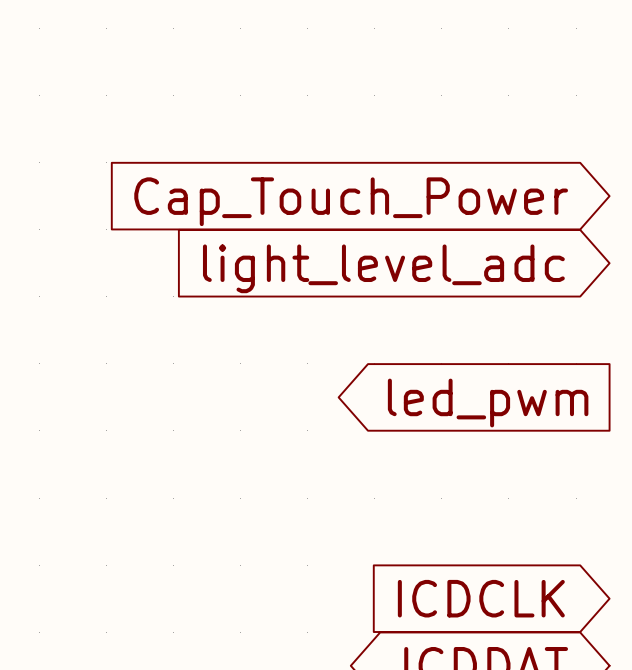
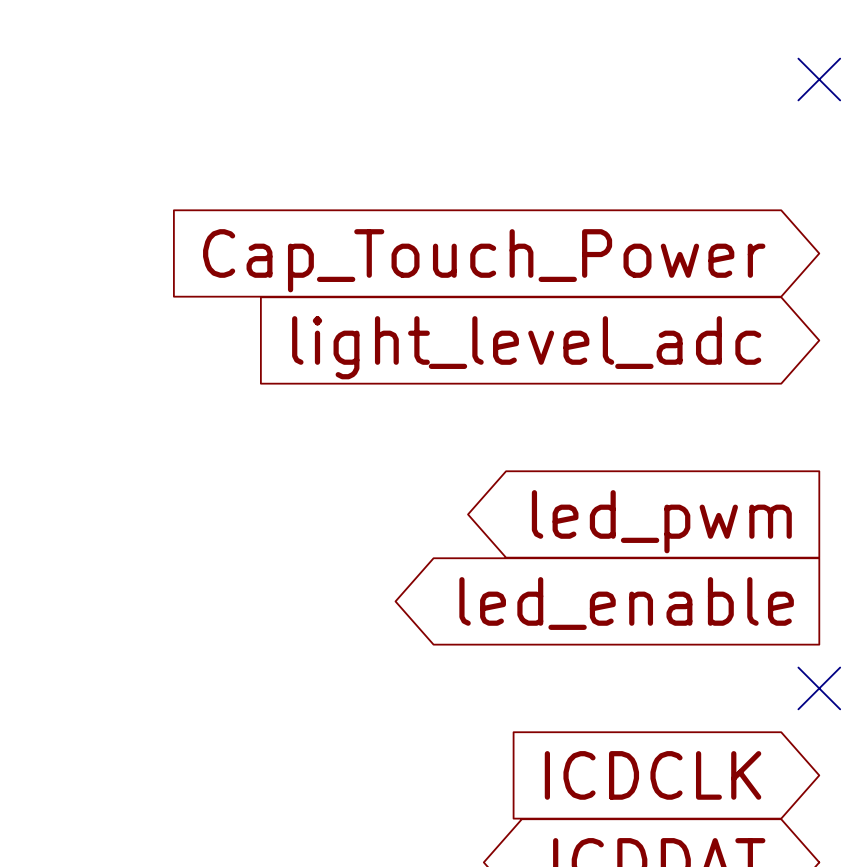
no-connect mark: none -> (819, 79)
global label: none -> led_enable (626, 603)
no-connect mark: none -> (819, 688)

